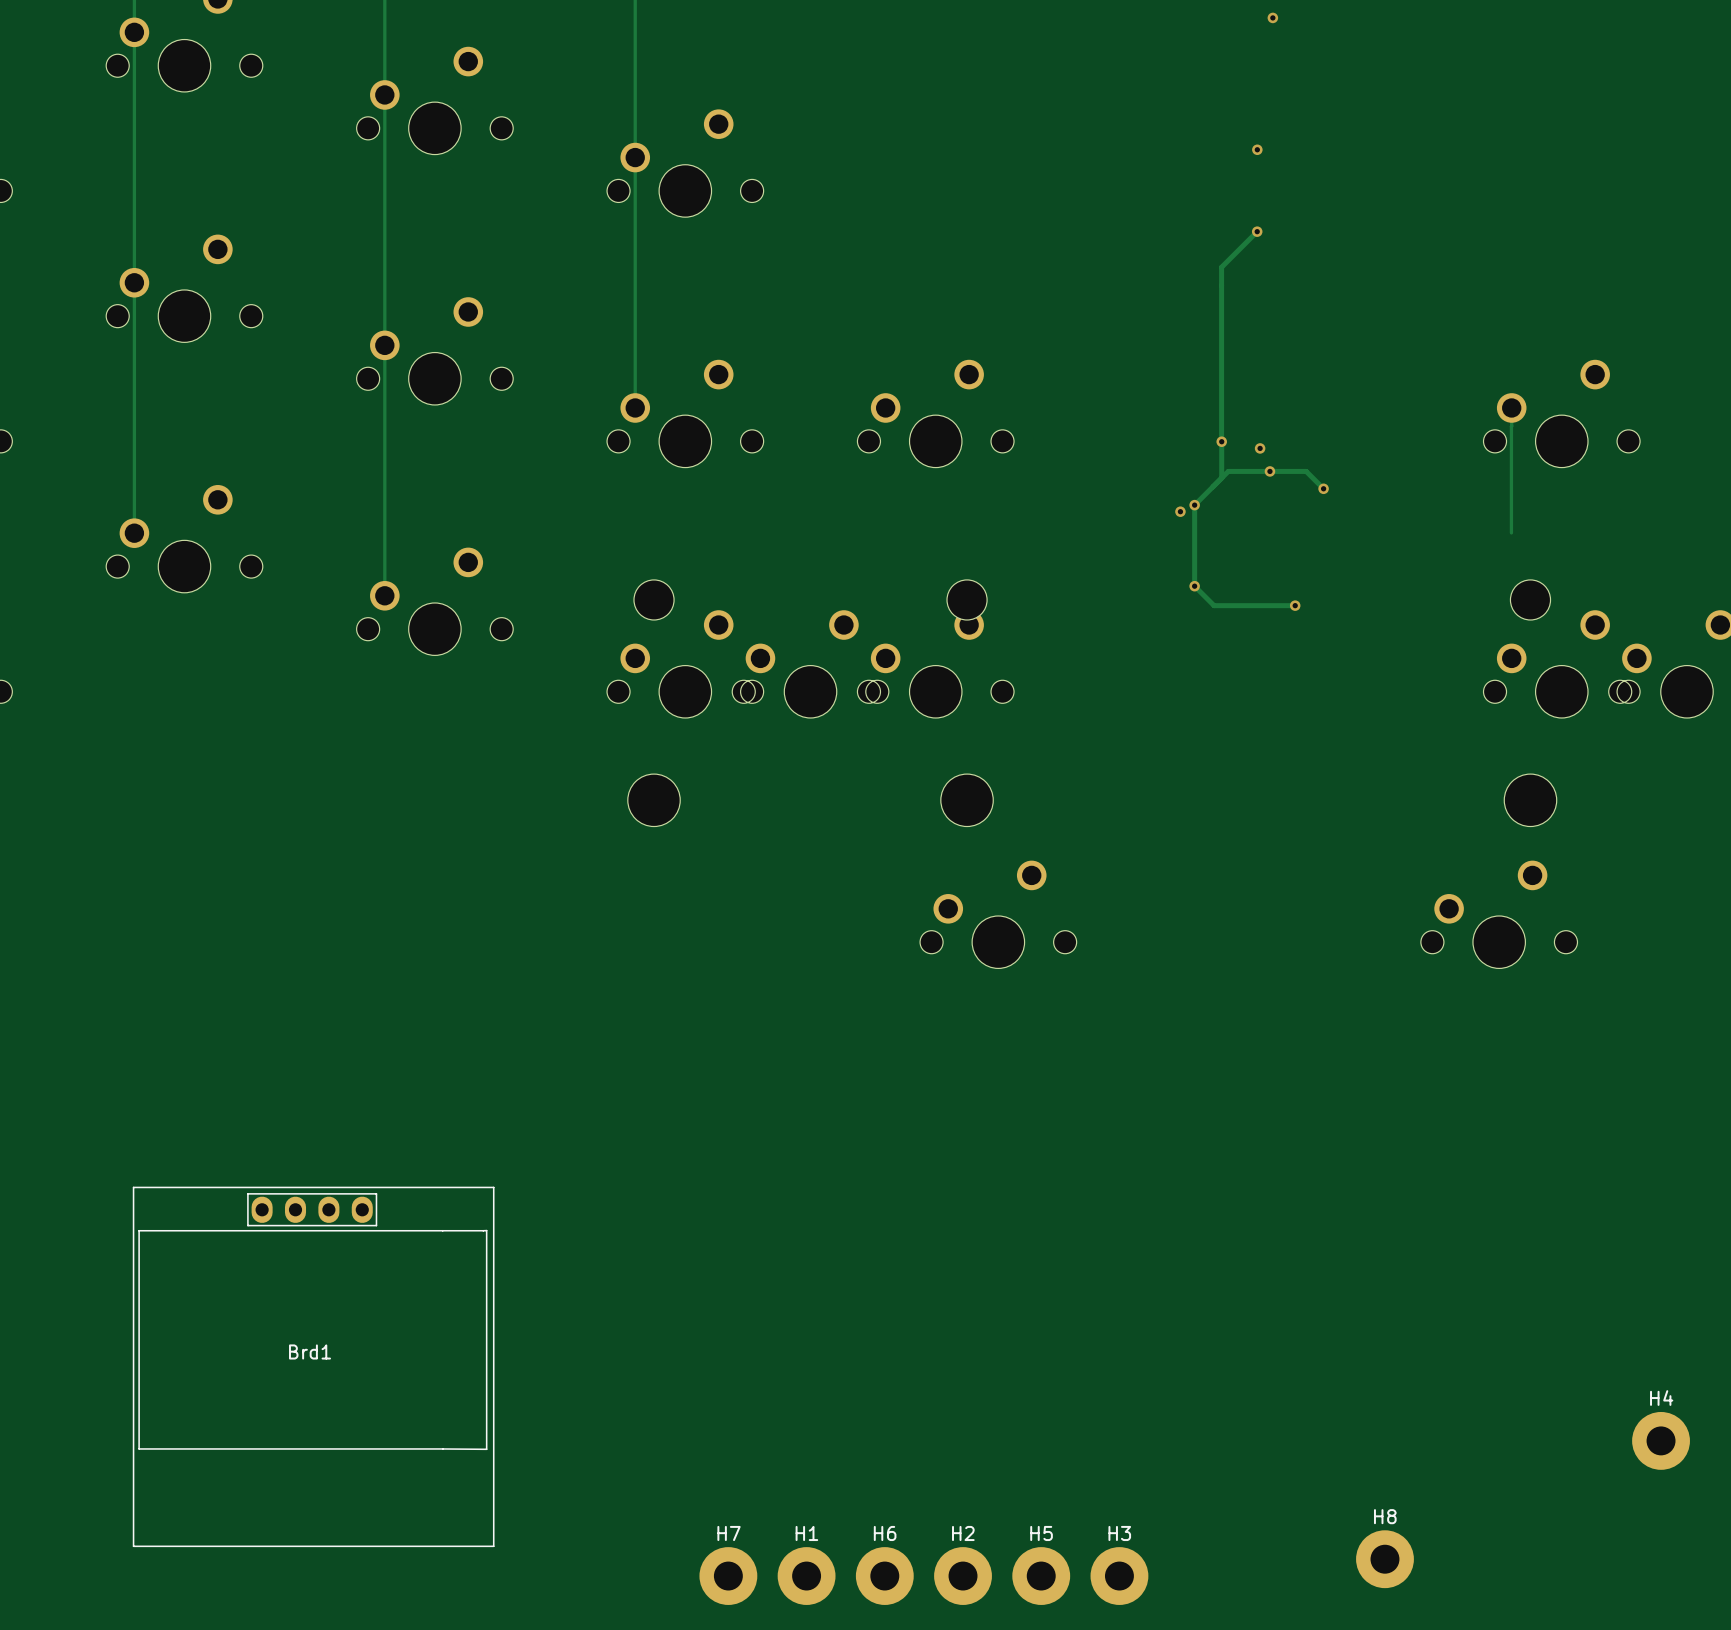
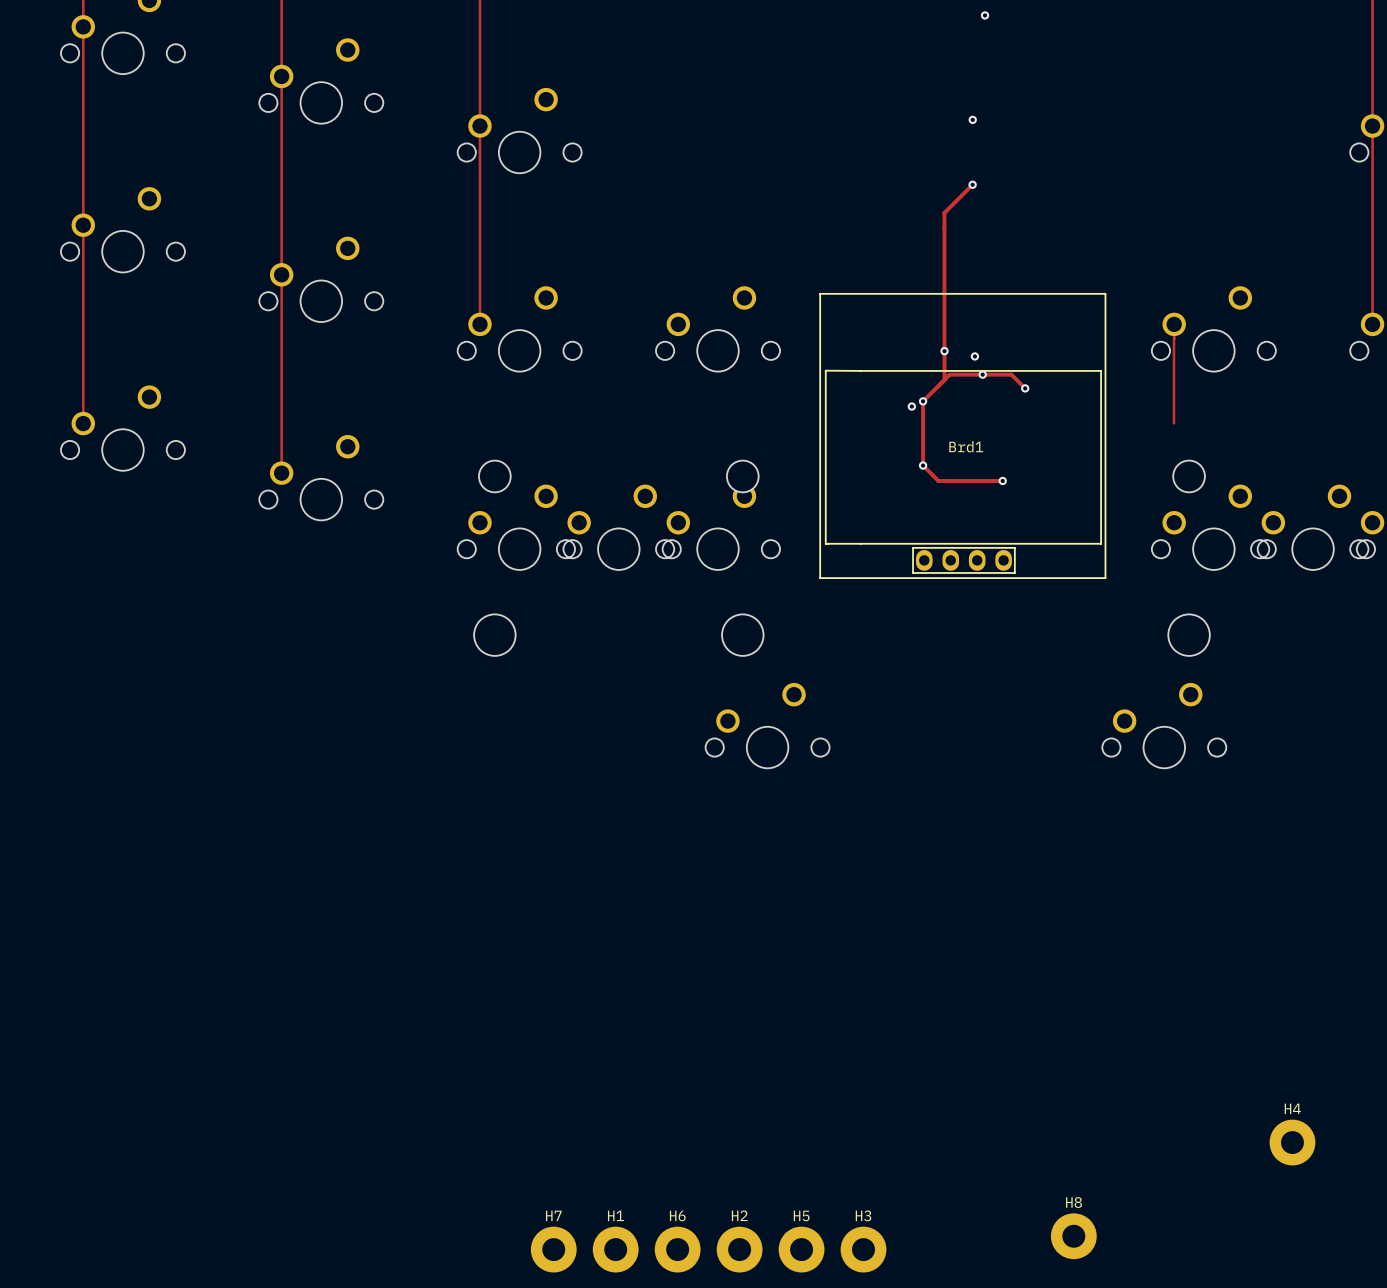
Brd1 rotation: 0° (313, 1366) -> 180° (962, 435)
Brd1 position: (313, 1366) -> (962, 435)

